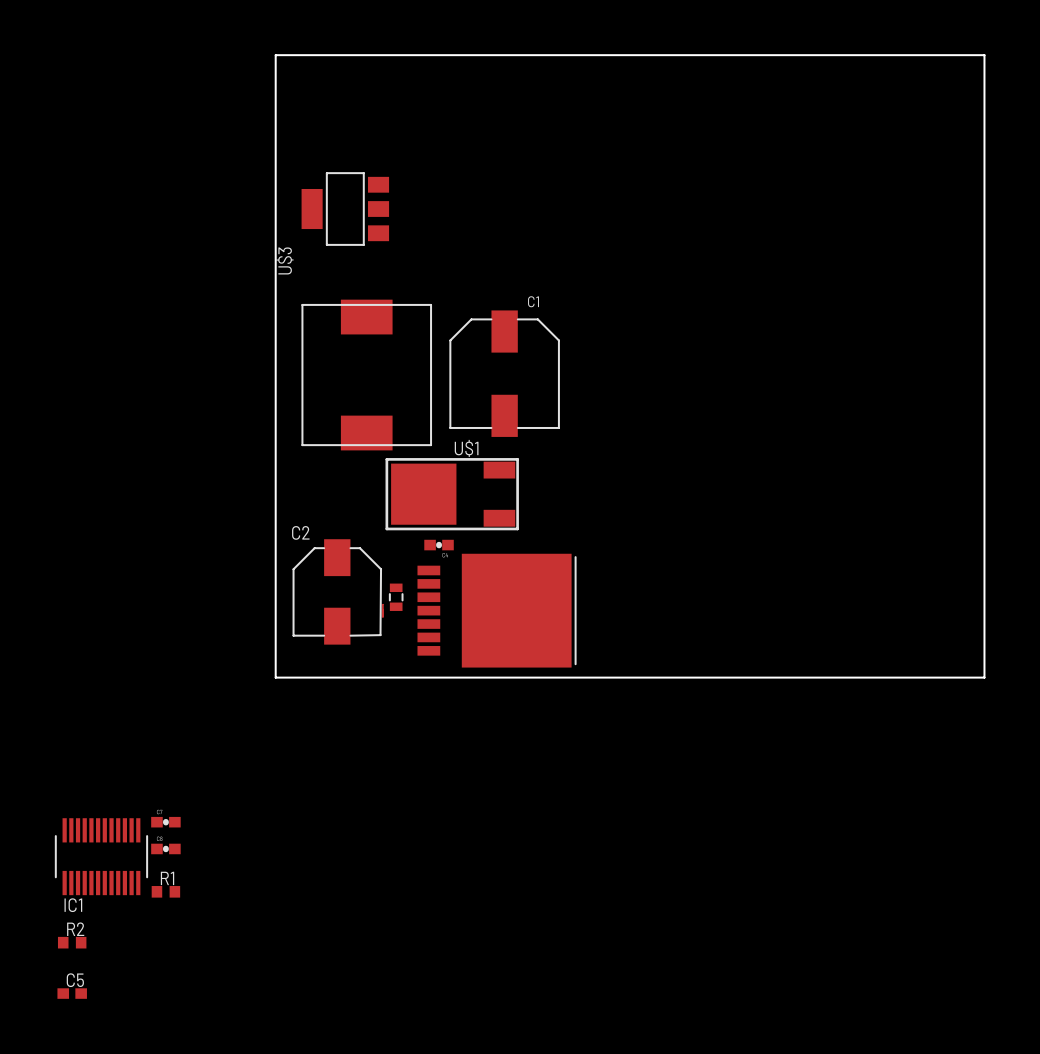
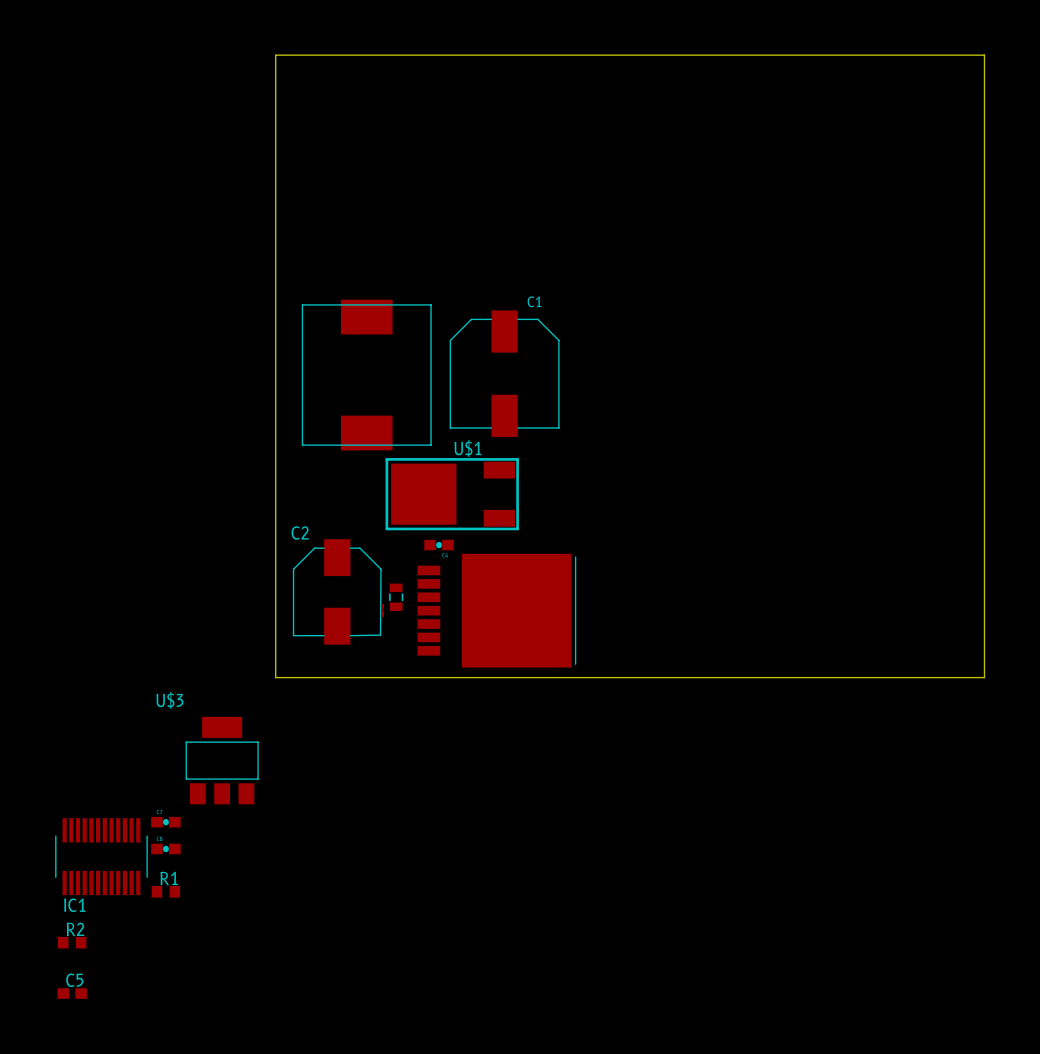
U$3 rotation: 0° (345, 209) -> 90° clockwise (222, 760)
U$3 position: (345, 209) -> (222, 760)

